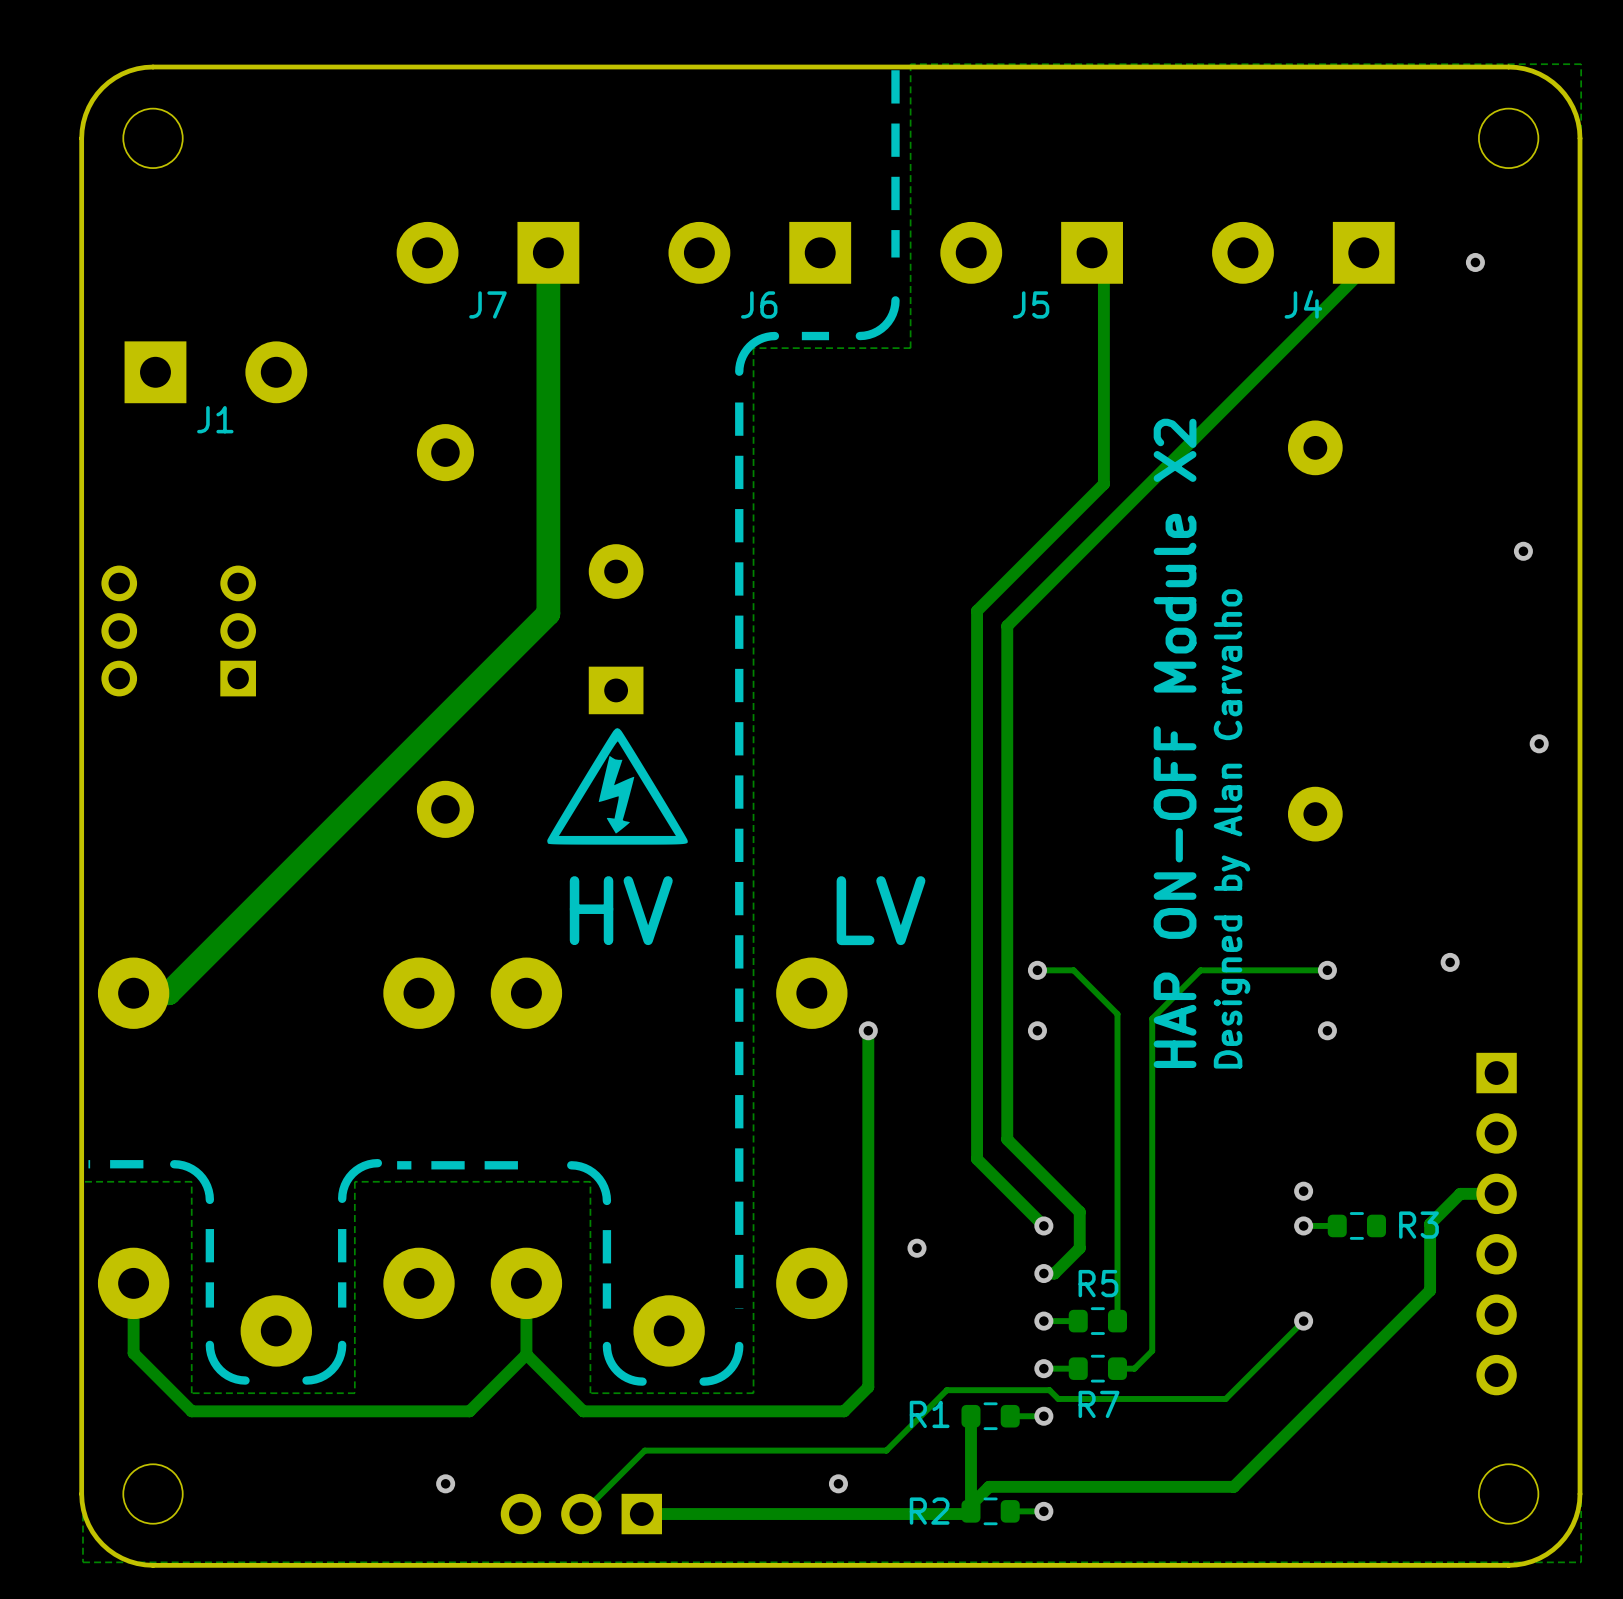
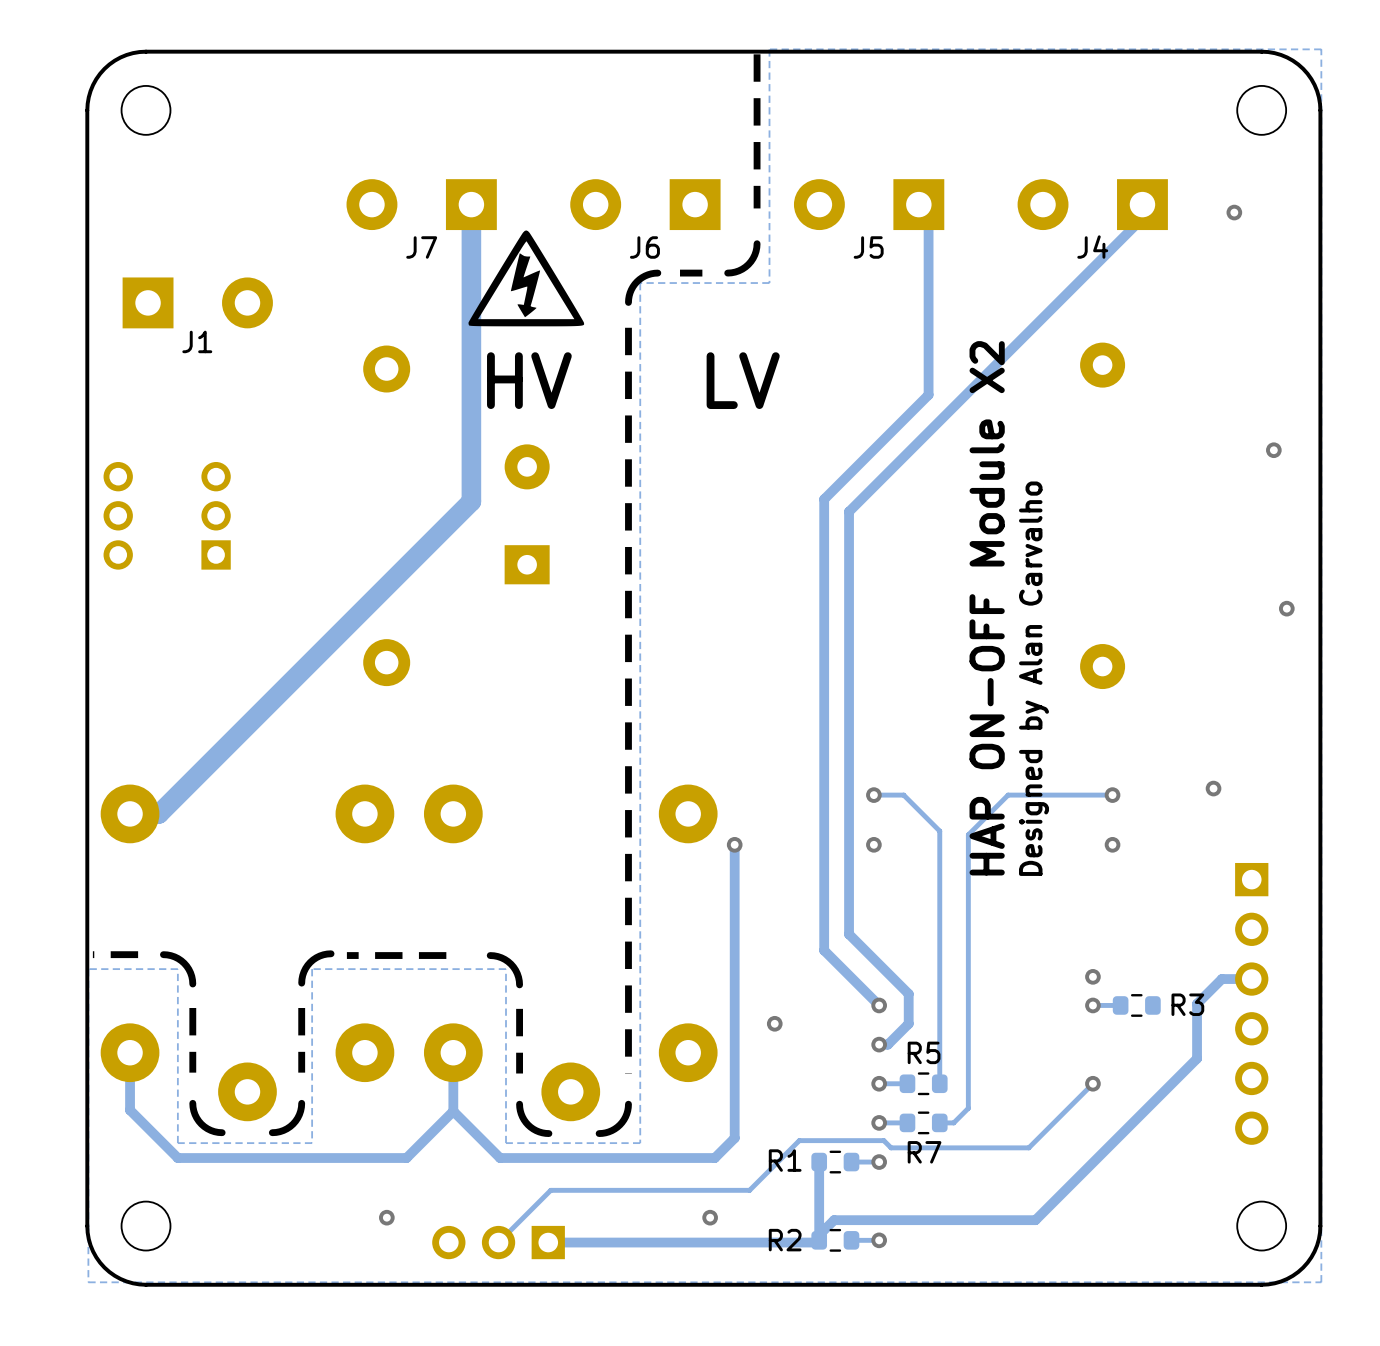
drawing position: (617, 786) -> (526, 278)
text position: HV (621, 910) -> HV (529, 380)
text position: LV (881, 910) -> LV (743, 380)

